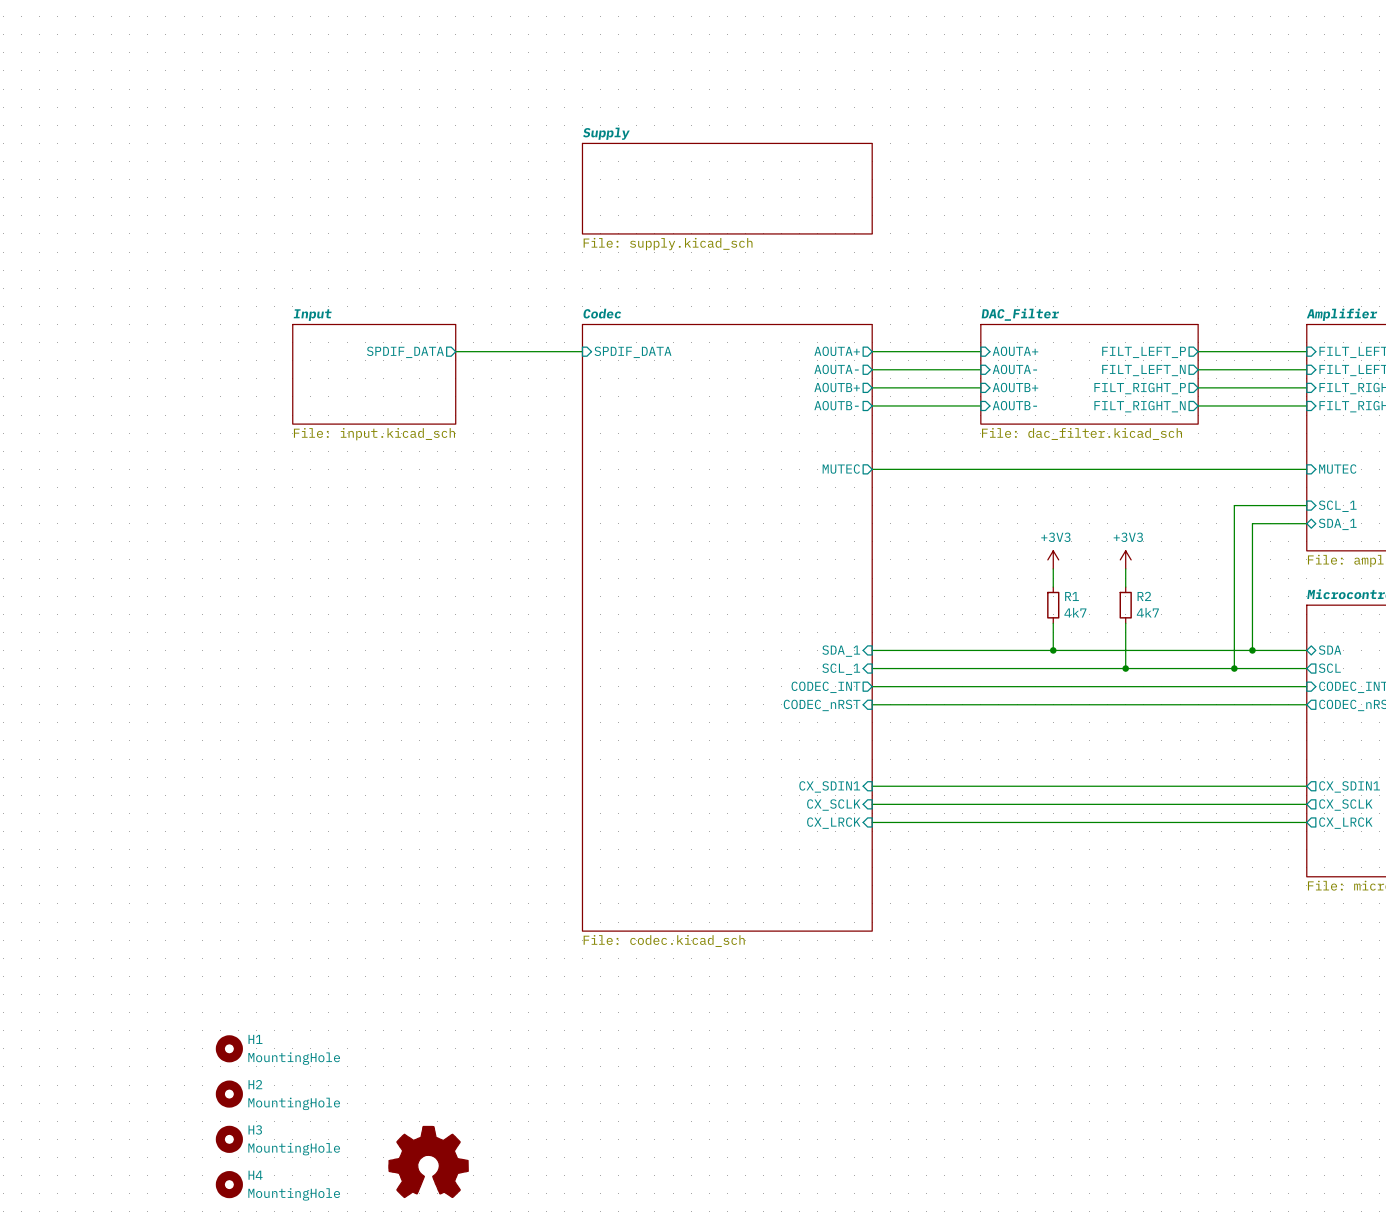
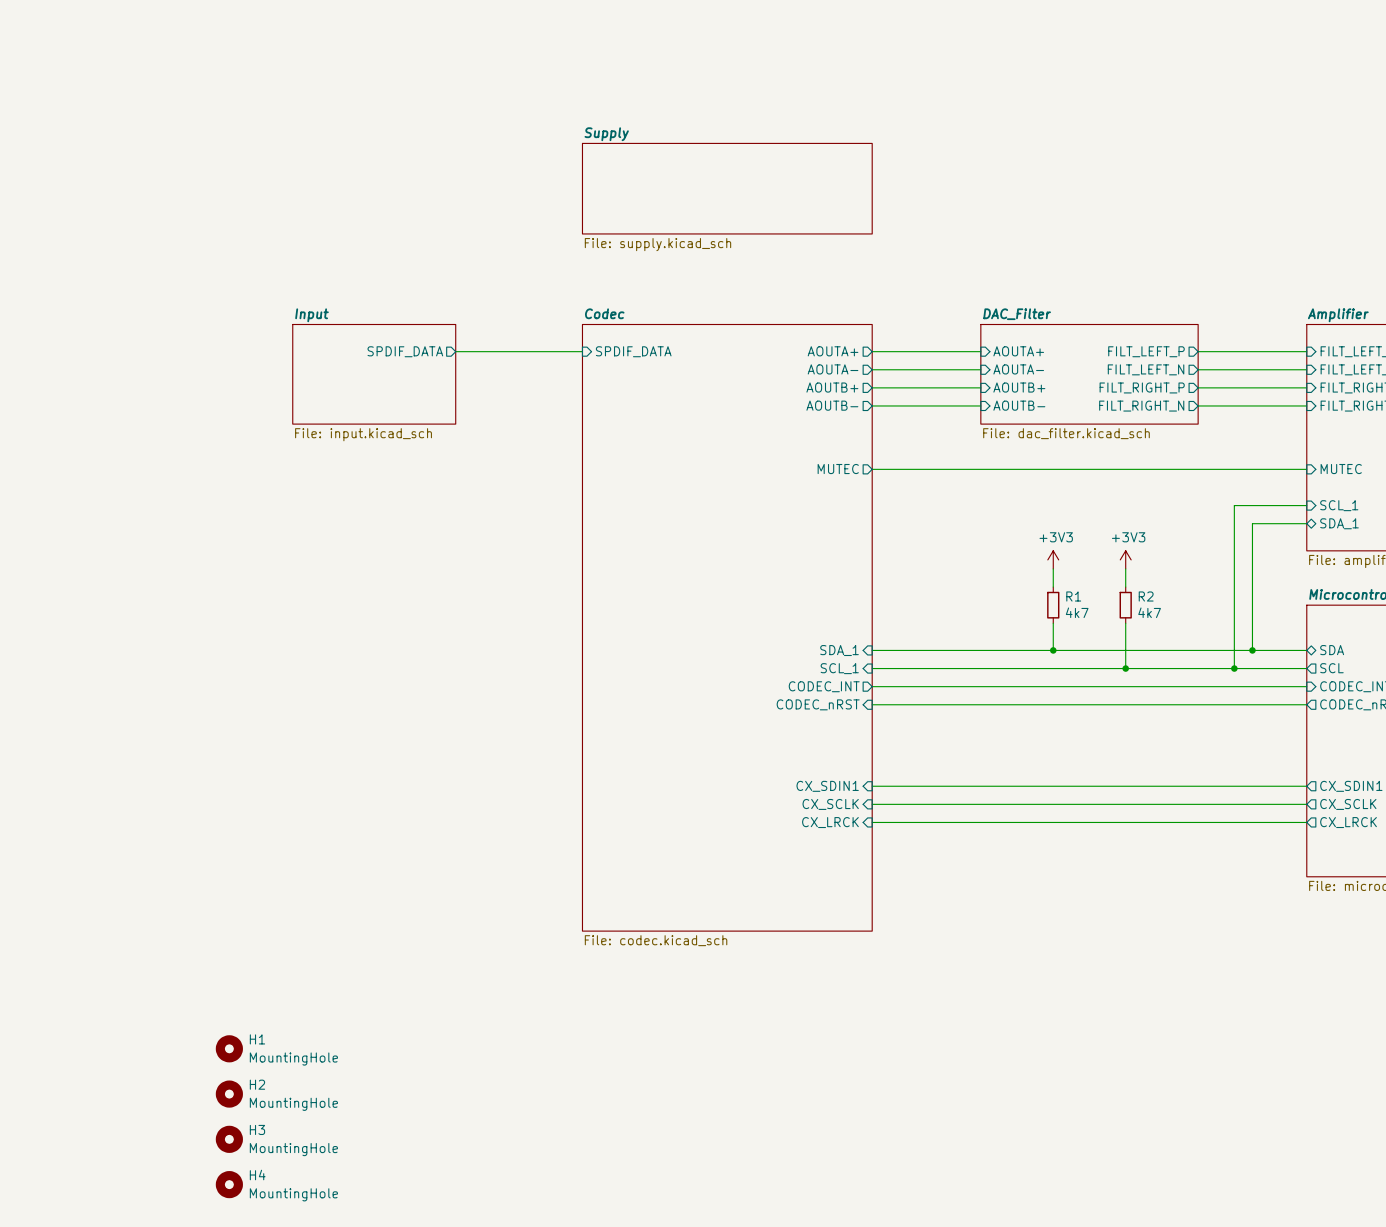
power symbol: (428, 1161) -> none

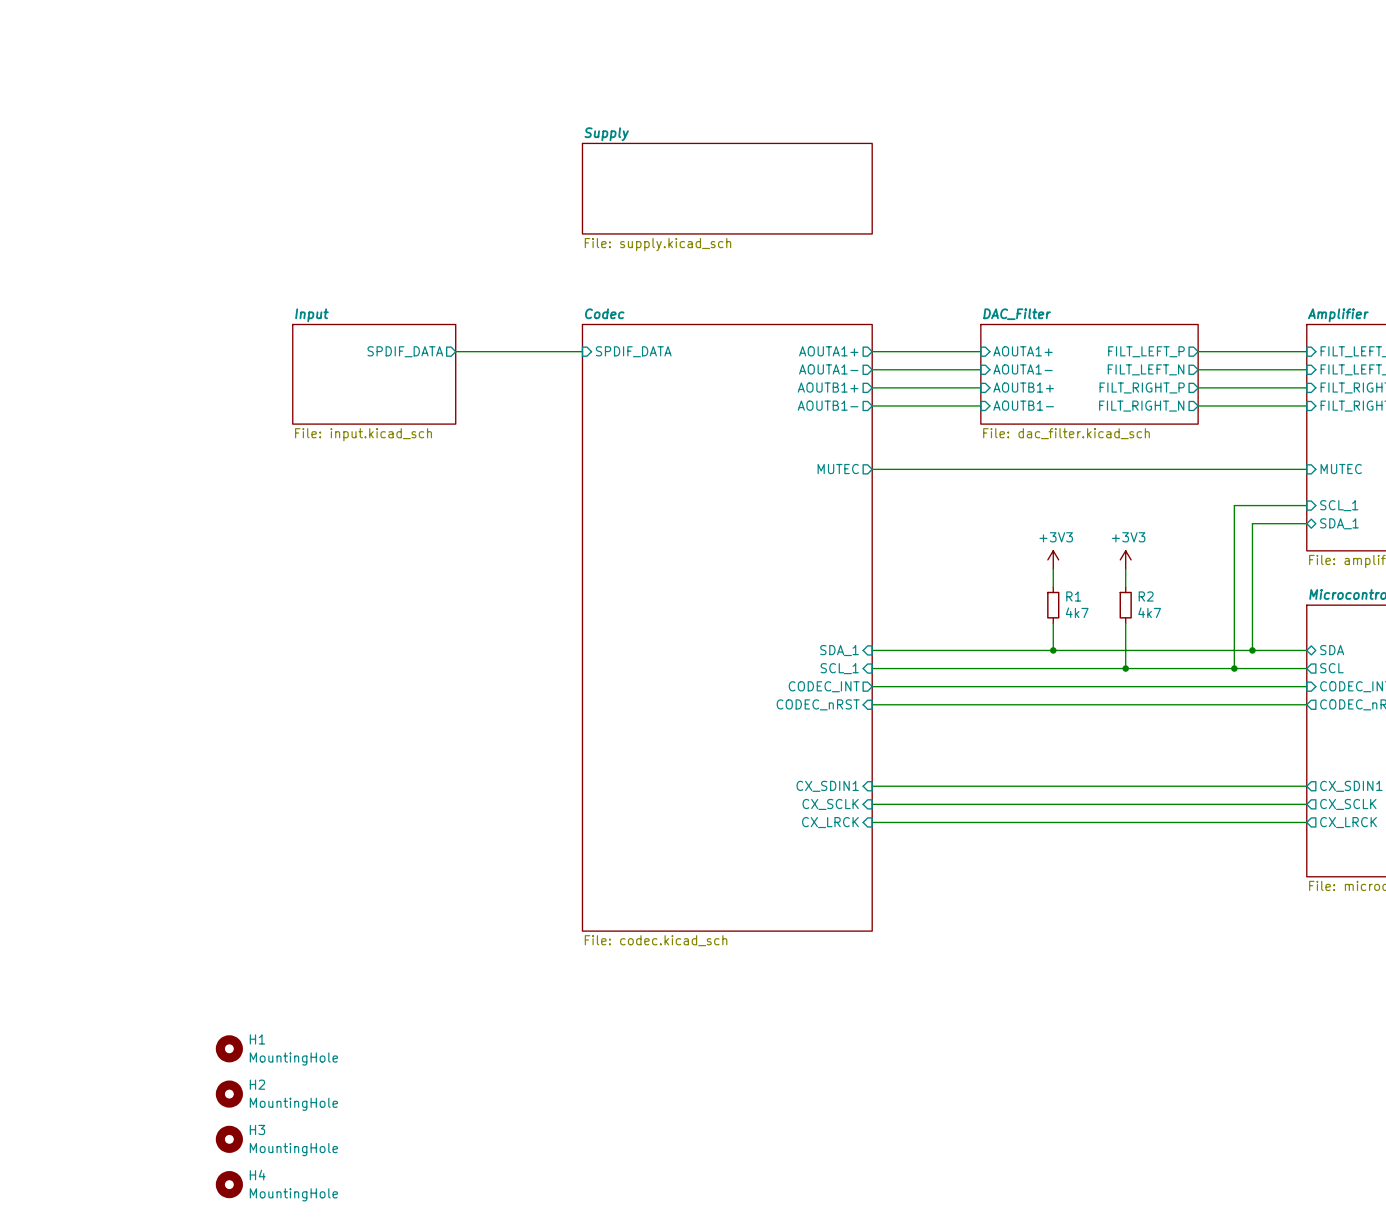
sheet pin: AOUTA+ (833, 351) -> AOUTA1+ (828, 351)
sheet pin: AOUTA+ (1018, 351) -> AOUTA1+ (1023, 351)
sheet pin: AOUTA- (833, 369) -> AOUTA1- (828, 369)
sheet pin: AOUTA- (1018, 369) -> AOUTA1- (1023, 369)
sheet pin: AOUTB+ (832, 387) -> AOUTB1+ (828, 387)
sheet pin: AOUTB+ (1019, 387) -> AOUTB1+ (1023, 387)
sheet pin: AOUTB- (832, 405) -> AOUTB1- (828, 405)
sheet pin: AOUTB- (1019, 405) -> AOUTB1- (1023, 405)

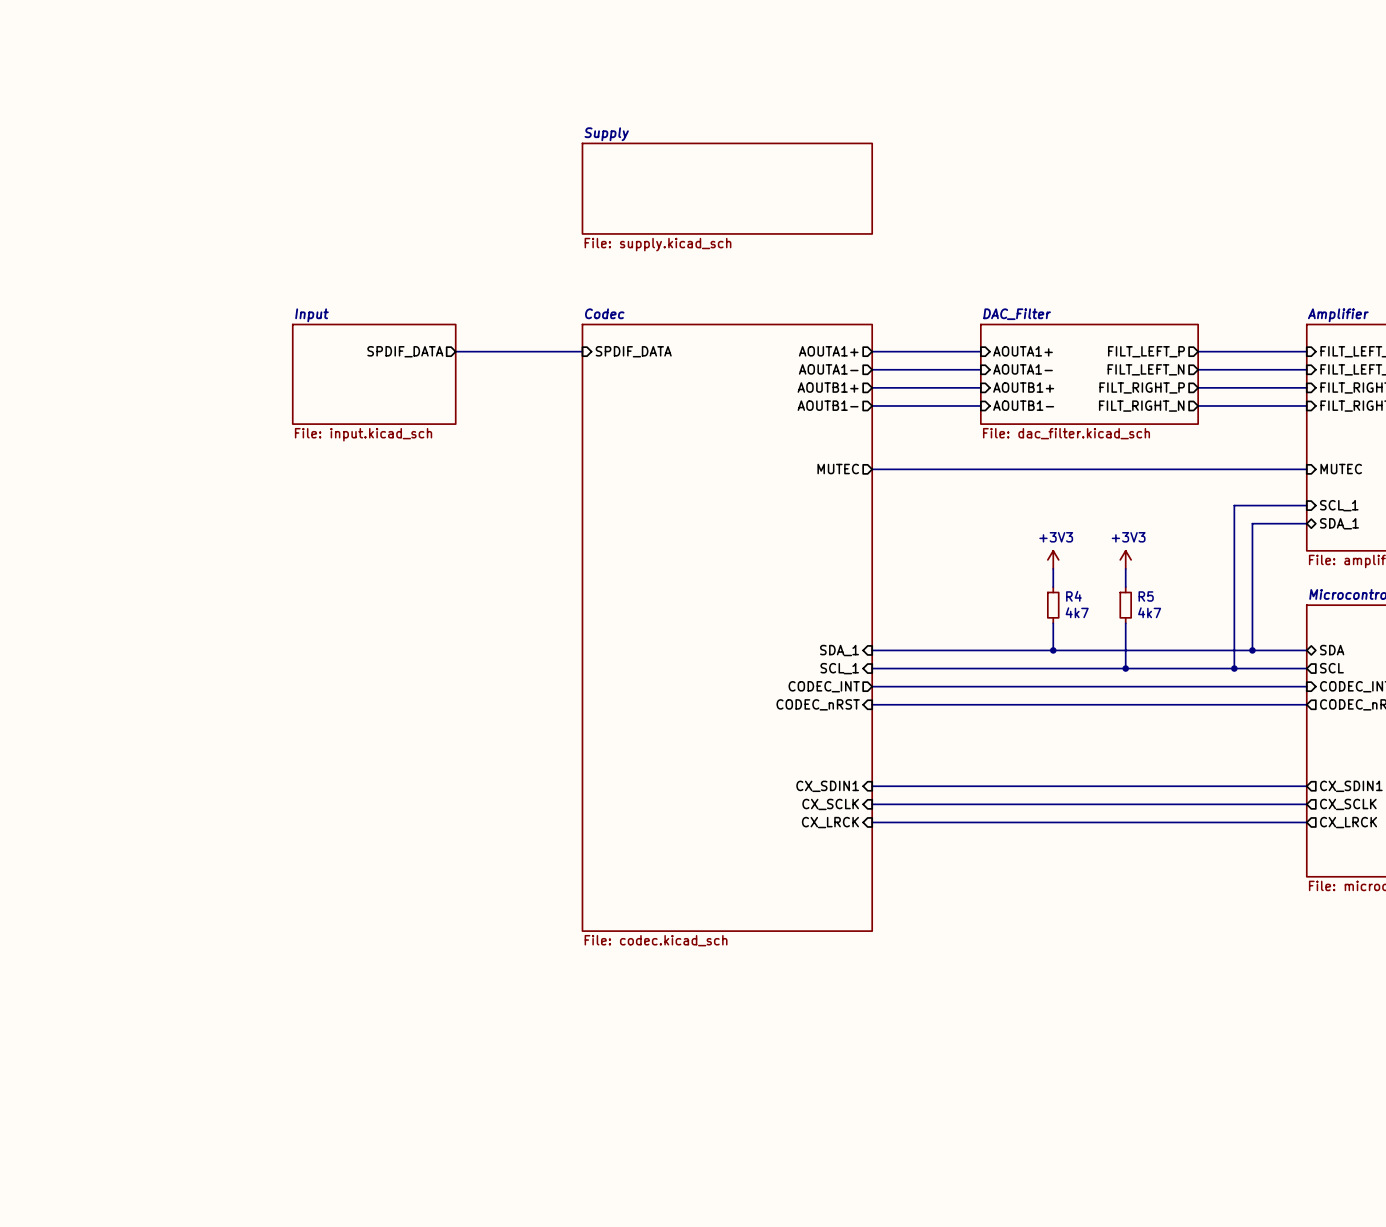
R1 name: R1 (1073, 596) -> R4 (1073, 596)
R2 name: R2 (1146, 596) -> R5 (1146, 596)
H1: MountingHole (229, 1048) -> none
H2: MountingHole (229, 1094) -> none
H3: MountingHole (229, 1139) -> none
H4: MountingHole (229, 1184) -> none

